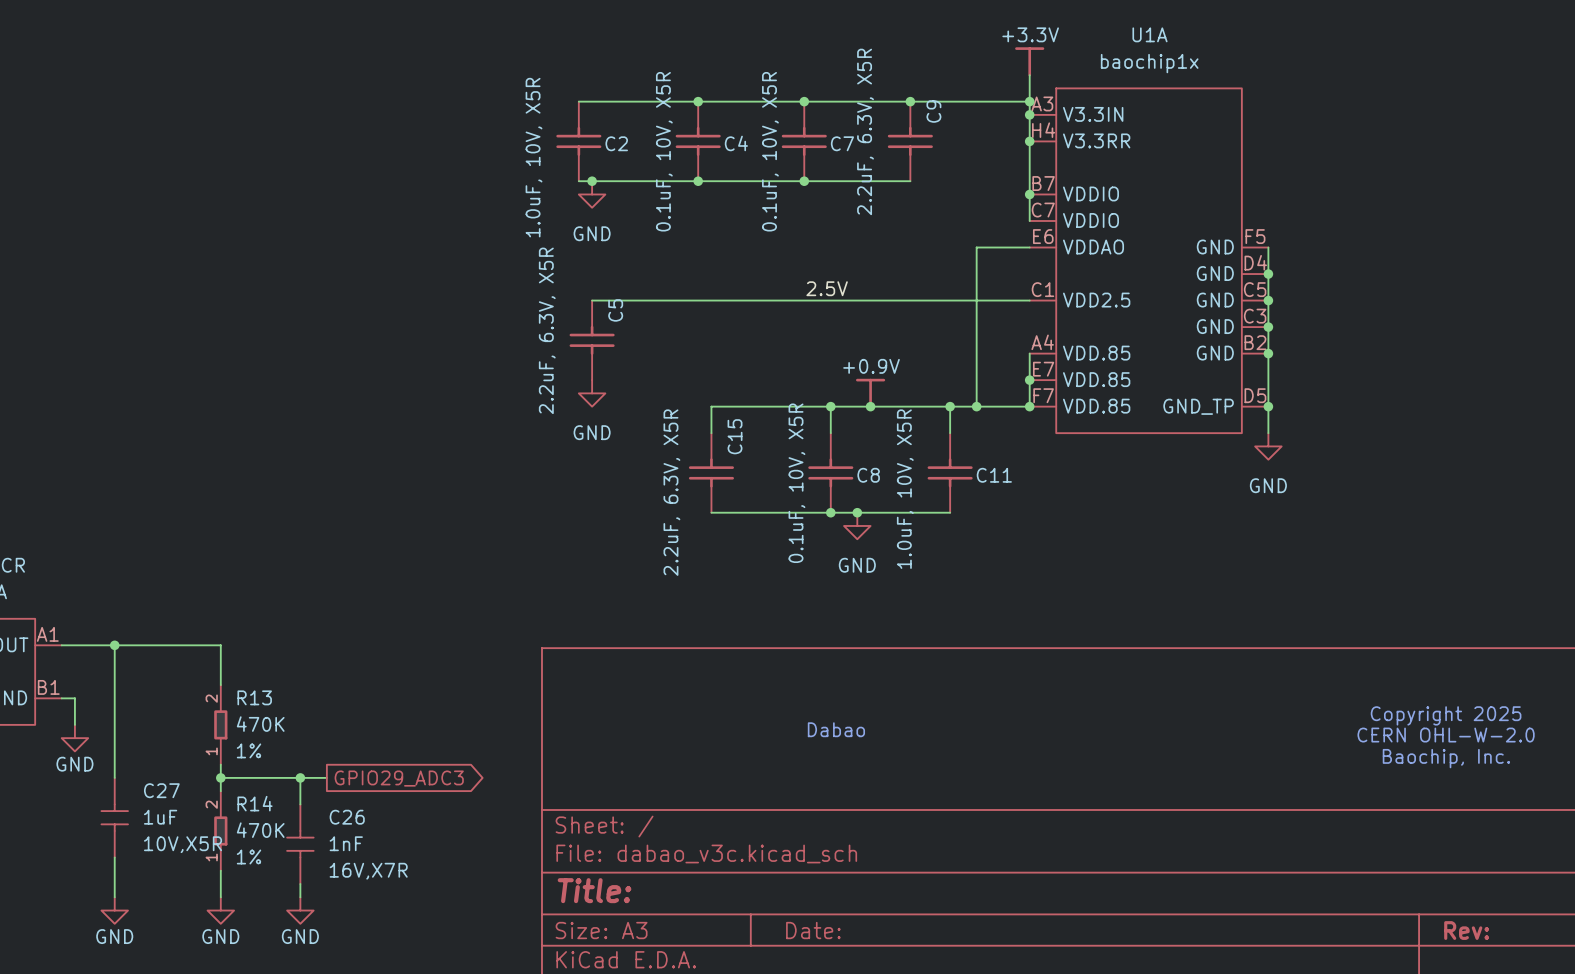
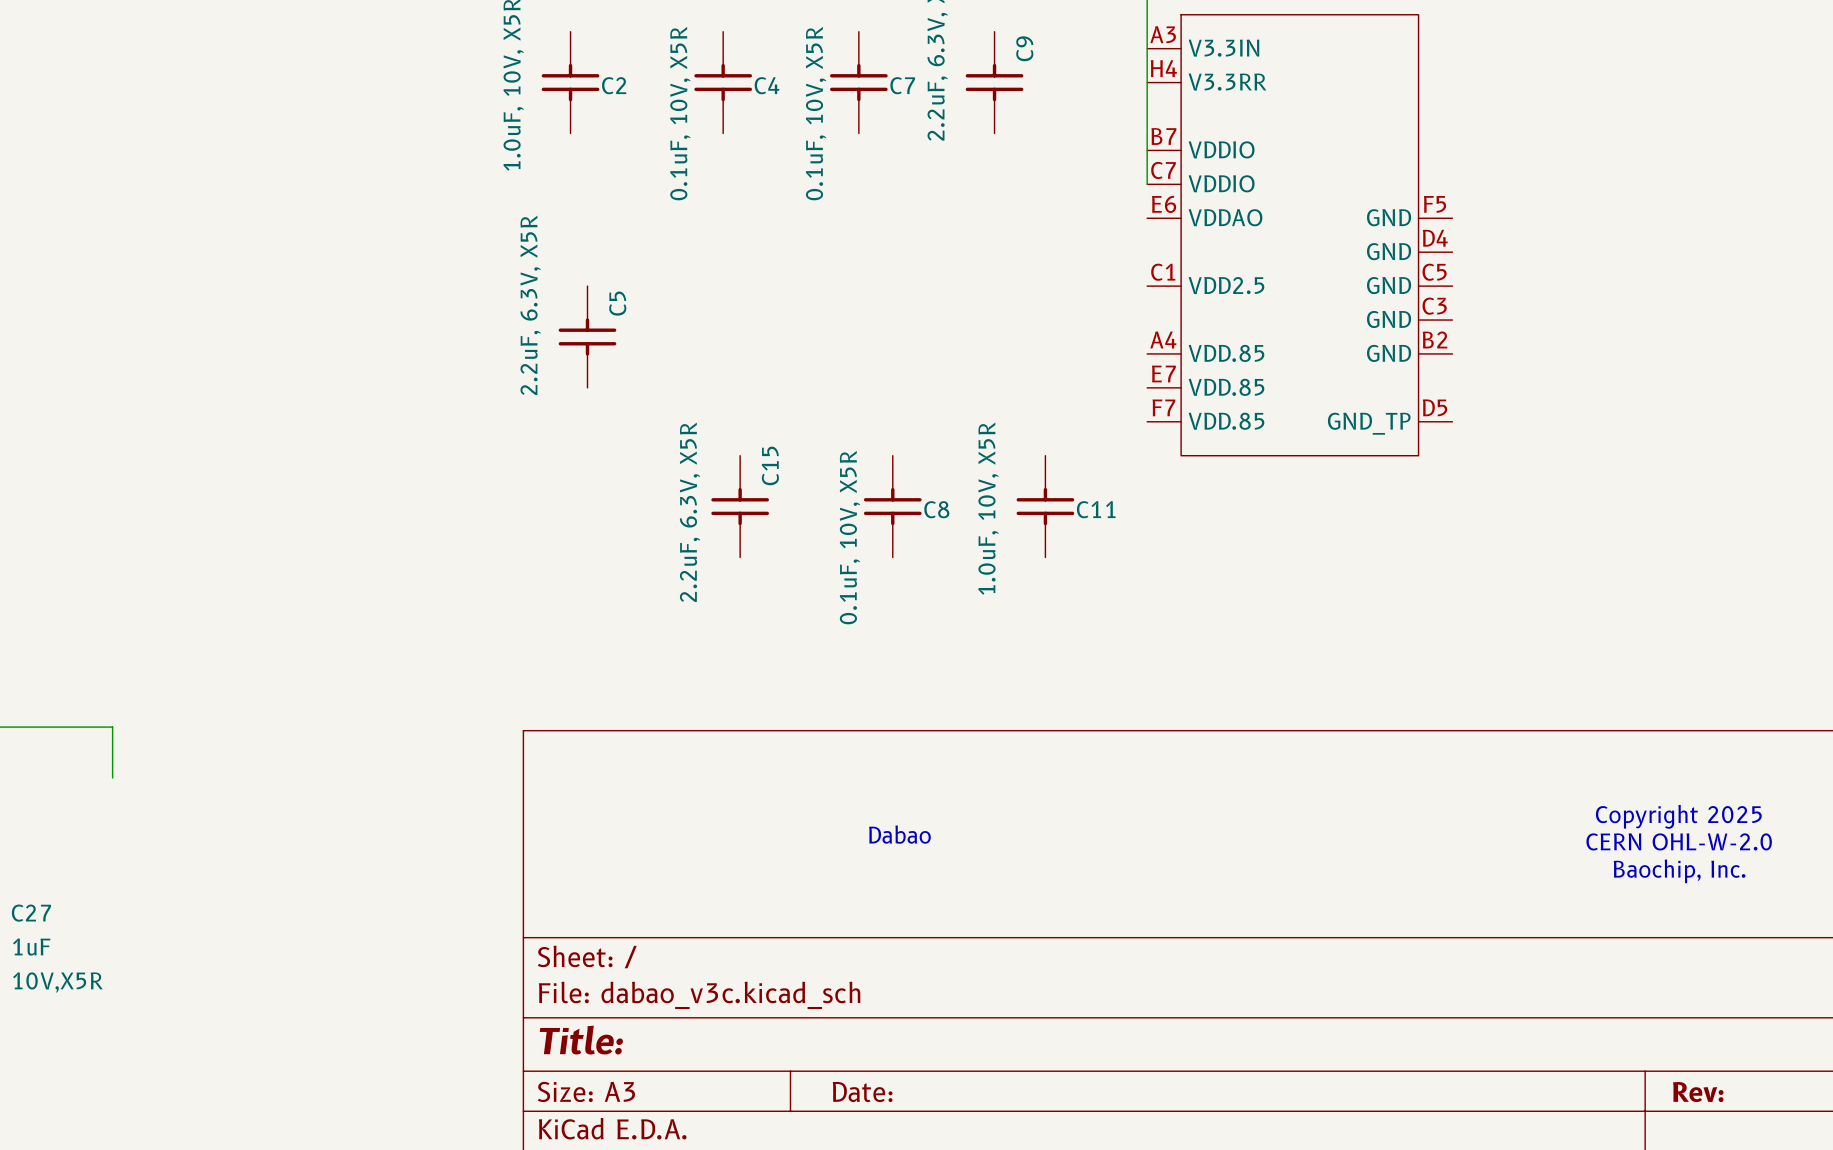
wire: (578, 101) (1029, 101) -> none
junction: (698, 101) -> none
junction: (804, 101) -> none
junction: (910, 101) -> none
junction: (1029, 101) -> none
junction: (1029, 114) -> none
junction: (1029, 141) -> none
wire: (578, 181) (910, 181) -> none
junction: (592, 181) -> none
junction: (698, 181) -> none
junction: (804, 181) -> none
power symbol: GND (592, 194) -> none
junction: (1029, 194) -> none
wire: (1029, 247) (976, 247) (976, 406) -> none
wire: (1268, 247) (1268, 433) -> none
junction: (1268, 274) -> none
label: 2.5V (827, 288) -> none
wire: (592, 300) (1029, 300) -> none
junction: (1268, 300) -> none
junction: (1268, 327) -> none
wire: (1029, 353) (1029, 406) (711, 406) (711, 433) -> none
junction: (1268, 353) -> none
junction: (1029, 380) -> none
power symbol: GND (592, 393) -> none
power symbol: +0.9V (870, 393) -> none
wire: (830, 406) (830, 433) -> none
junction: (830, 406) -> none
junction: (870, 406) -> none
wire: (950, 406) (950, 433) -> none
junction: (950, 406) -> none
junction: (976, 406) -> none
junction: (1029, 406) -> none
junction: (1268, 406) -> none
power symbol: GND (1268, 446) -> none
wire: (711, 512) (950, 512) -> none
junction: (830, 512) -> none
junction: (857, 512) -> none
power symbol: GND (857, 525) -> none
R13: 470K (220, 724) -> none
wire: (220, 764) (220, 791) -> none
wire: (220, 777) (326, 777) -> none
junction: (220, 777) -> none
wire: (300, 777) (300, 804) -> none
junction: (300, 777) -> none
global label: GPIO29_ADC3 (399, 778) -> none
R14: 470K (220, 830) -> none
C26: 1nF (300, 844) -> none
wire: (220, 870) (220, 897) -> none
wire: (300, 884) (300, 897) -> none
power symbol: GND (220, 910) -> none
power symbol: GND (300, 910) -> none

